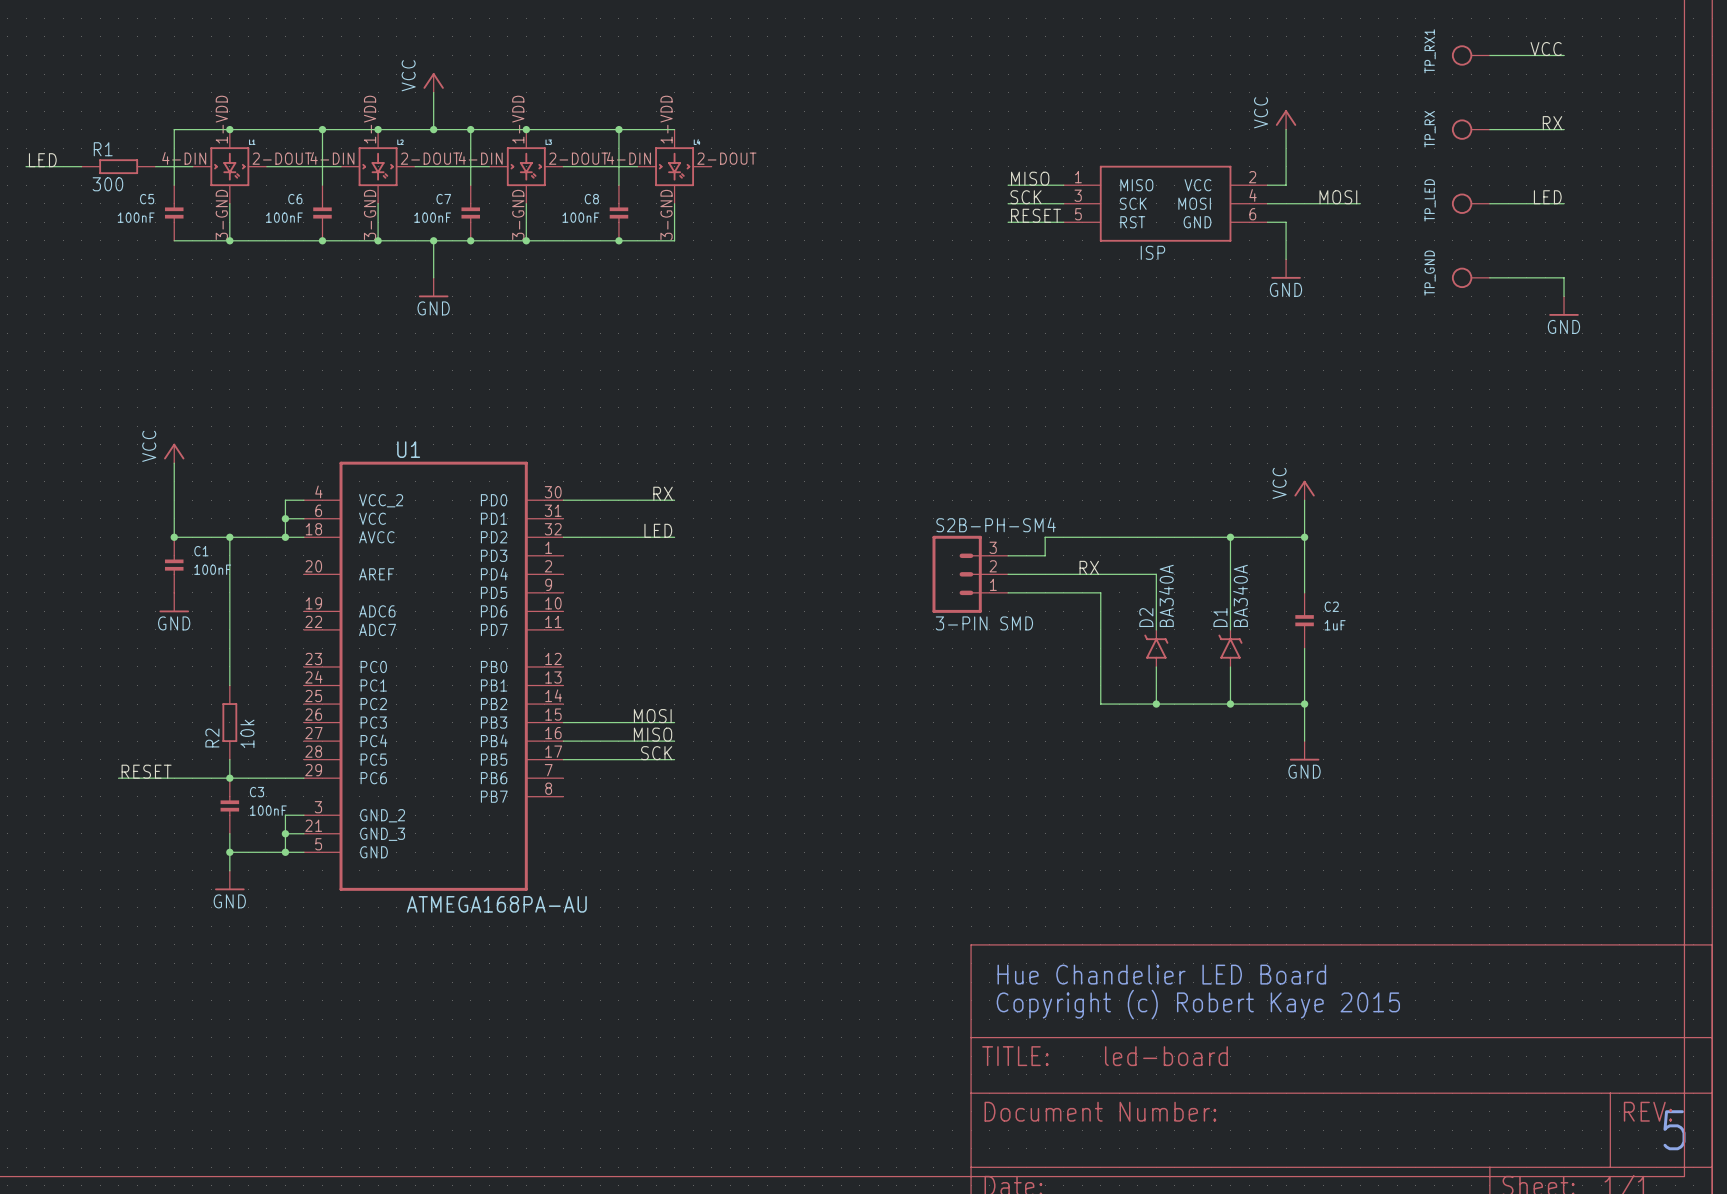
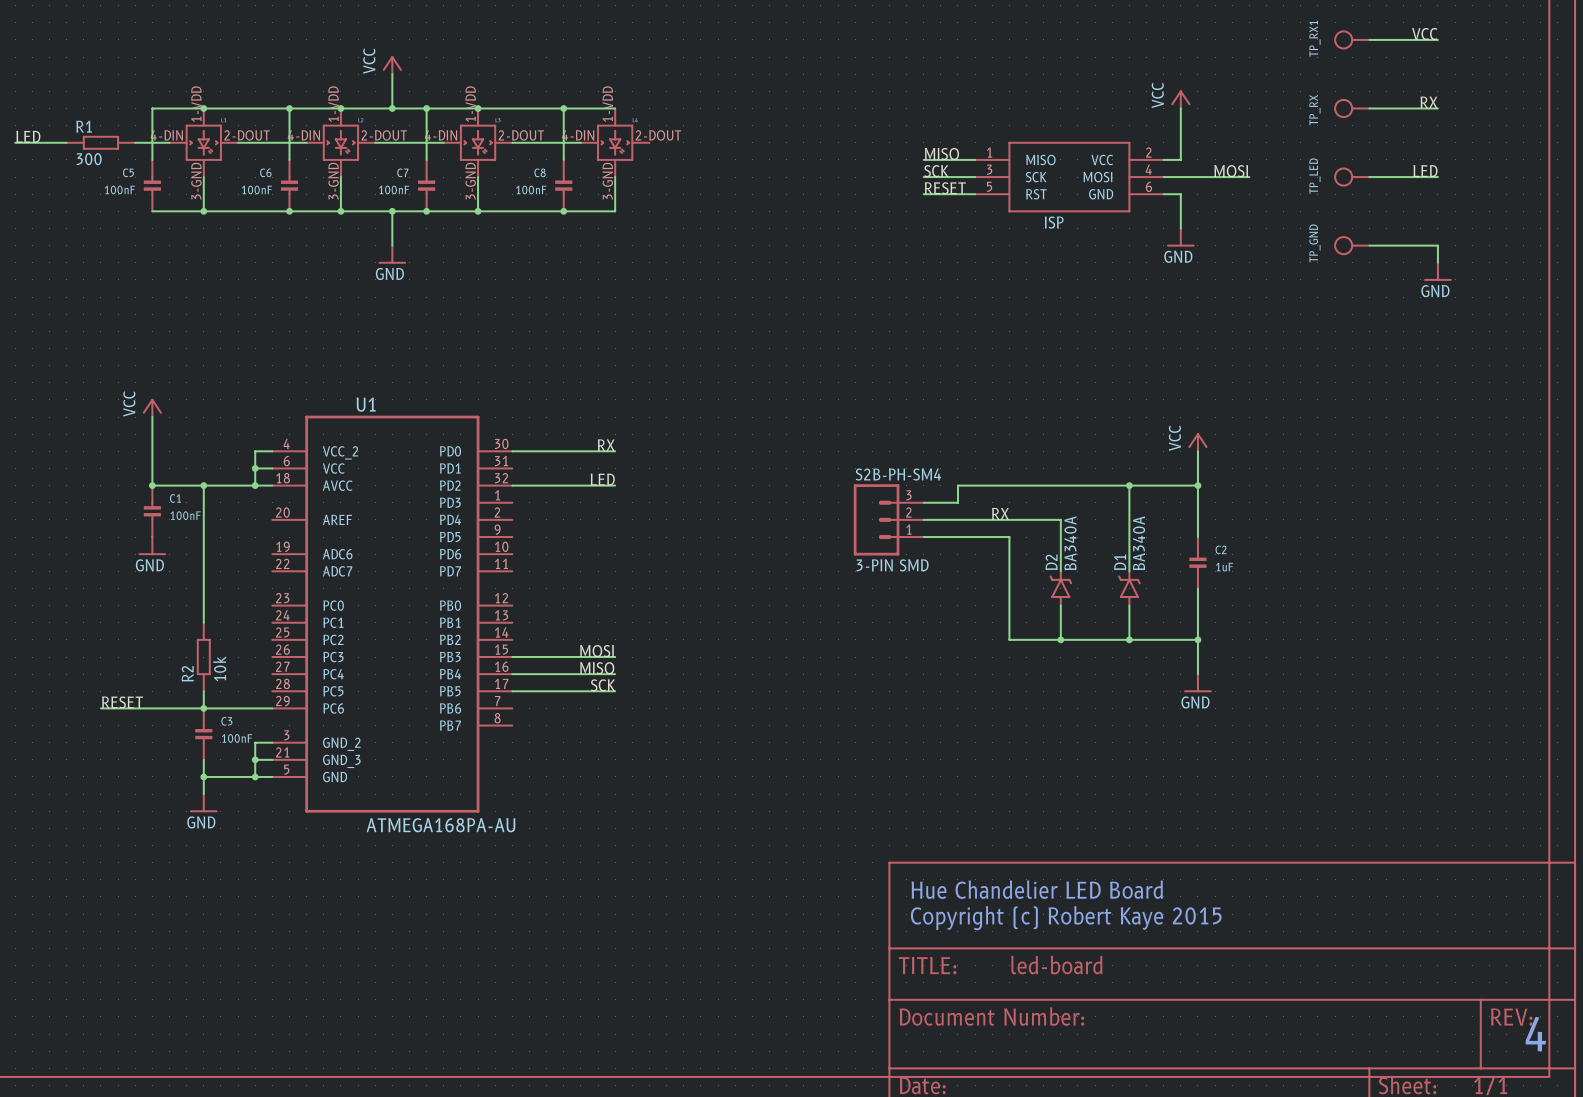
text: 5 (1674, 1130) -> 4 (1535, 1034)

